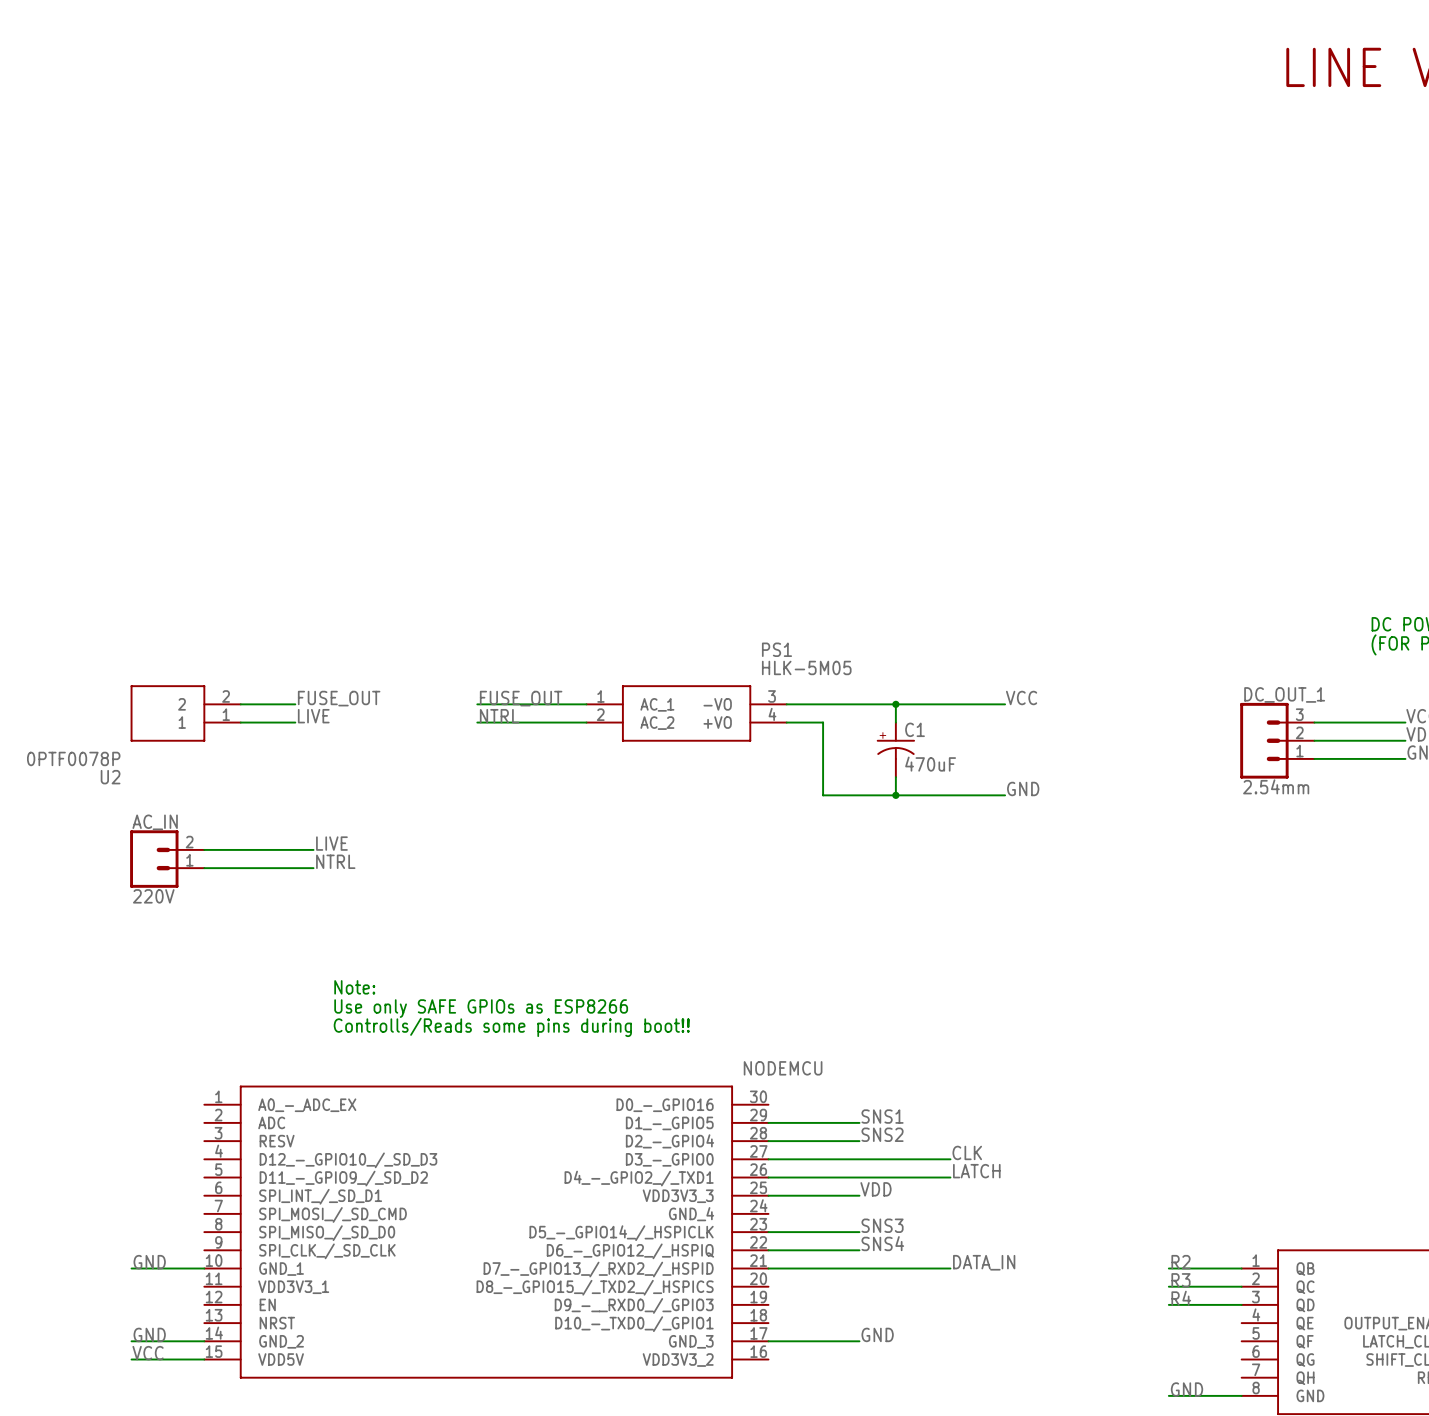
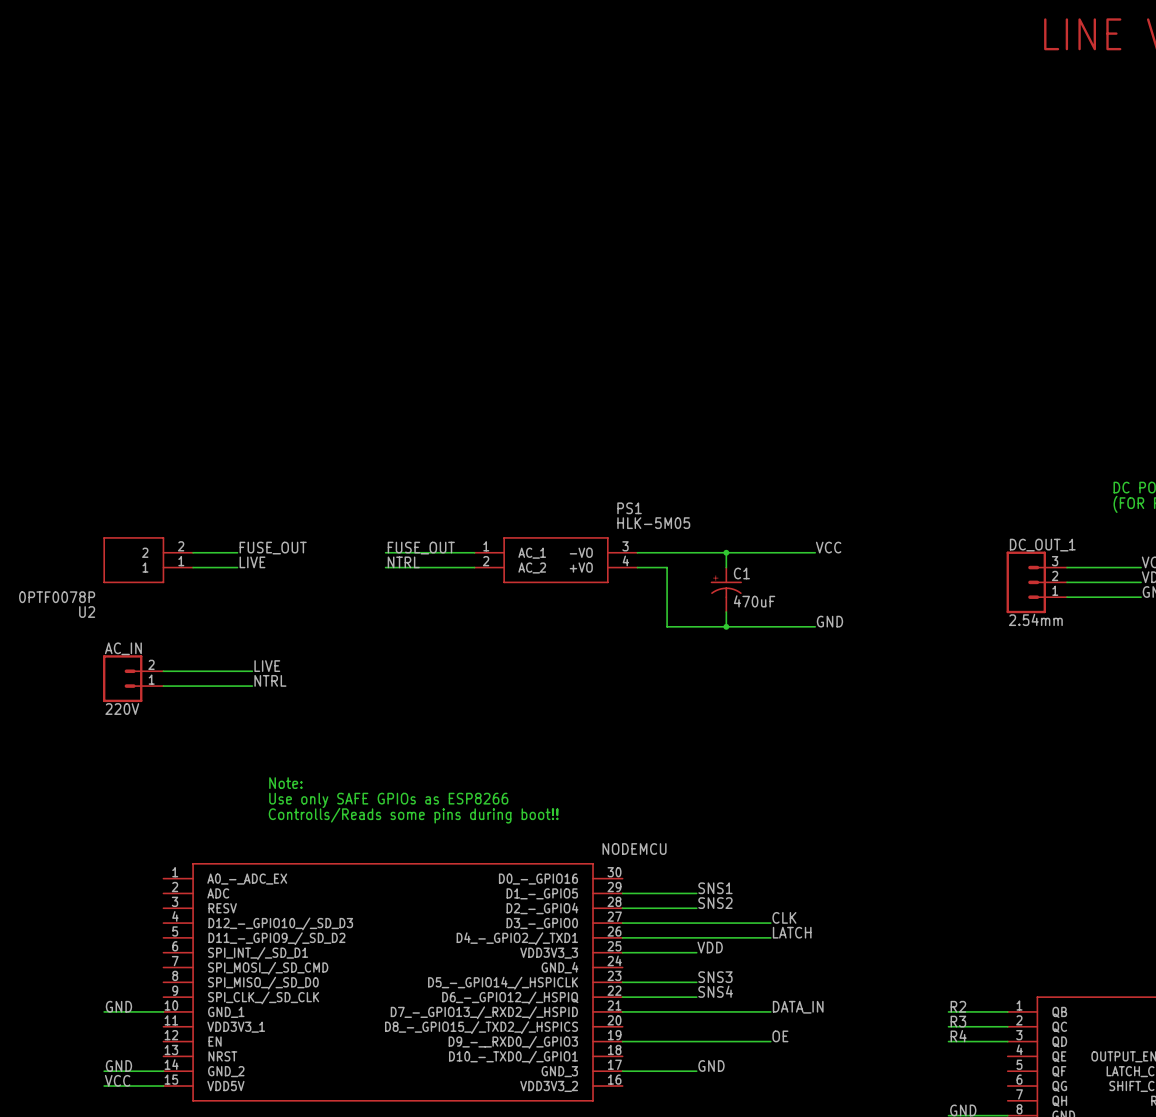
label: none -> OE (780, 1036)
wire: none -> (622, 1041) (770, 1041)

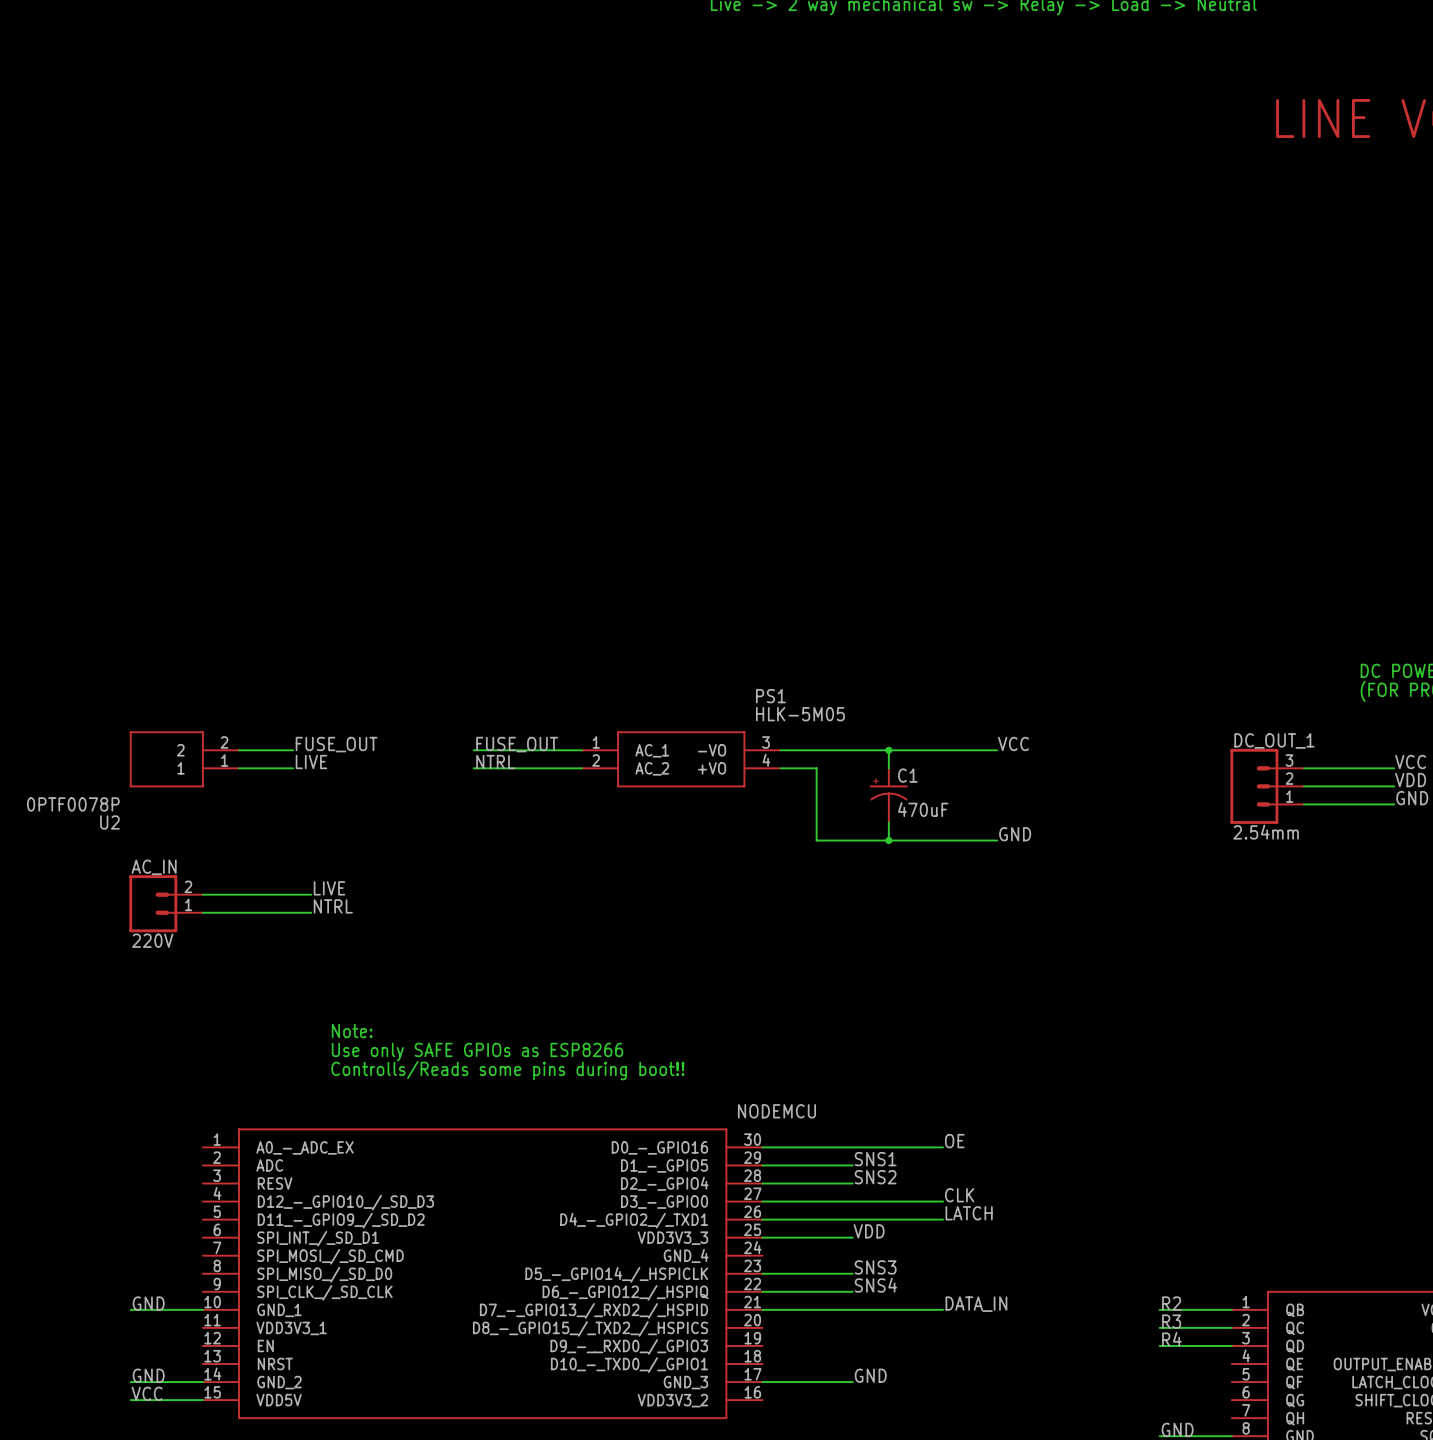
label: none -> OE (954, 1141)
wire: none -> (762, 1147) (943, 1147)
label: OE (780, 1036) -> none
wire: (622, 1041) (770, 1041) -> none

